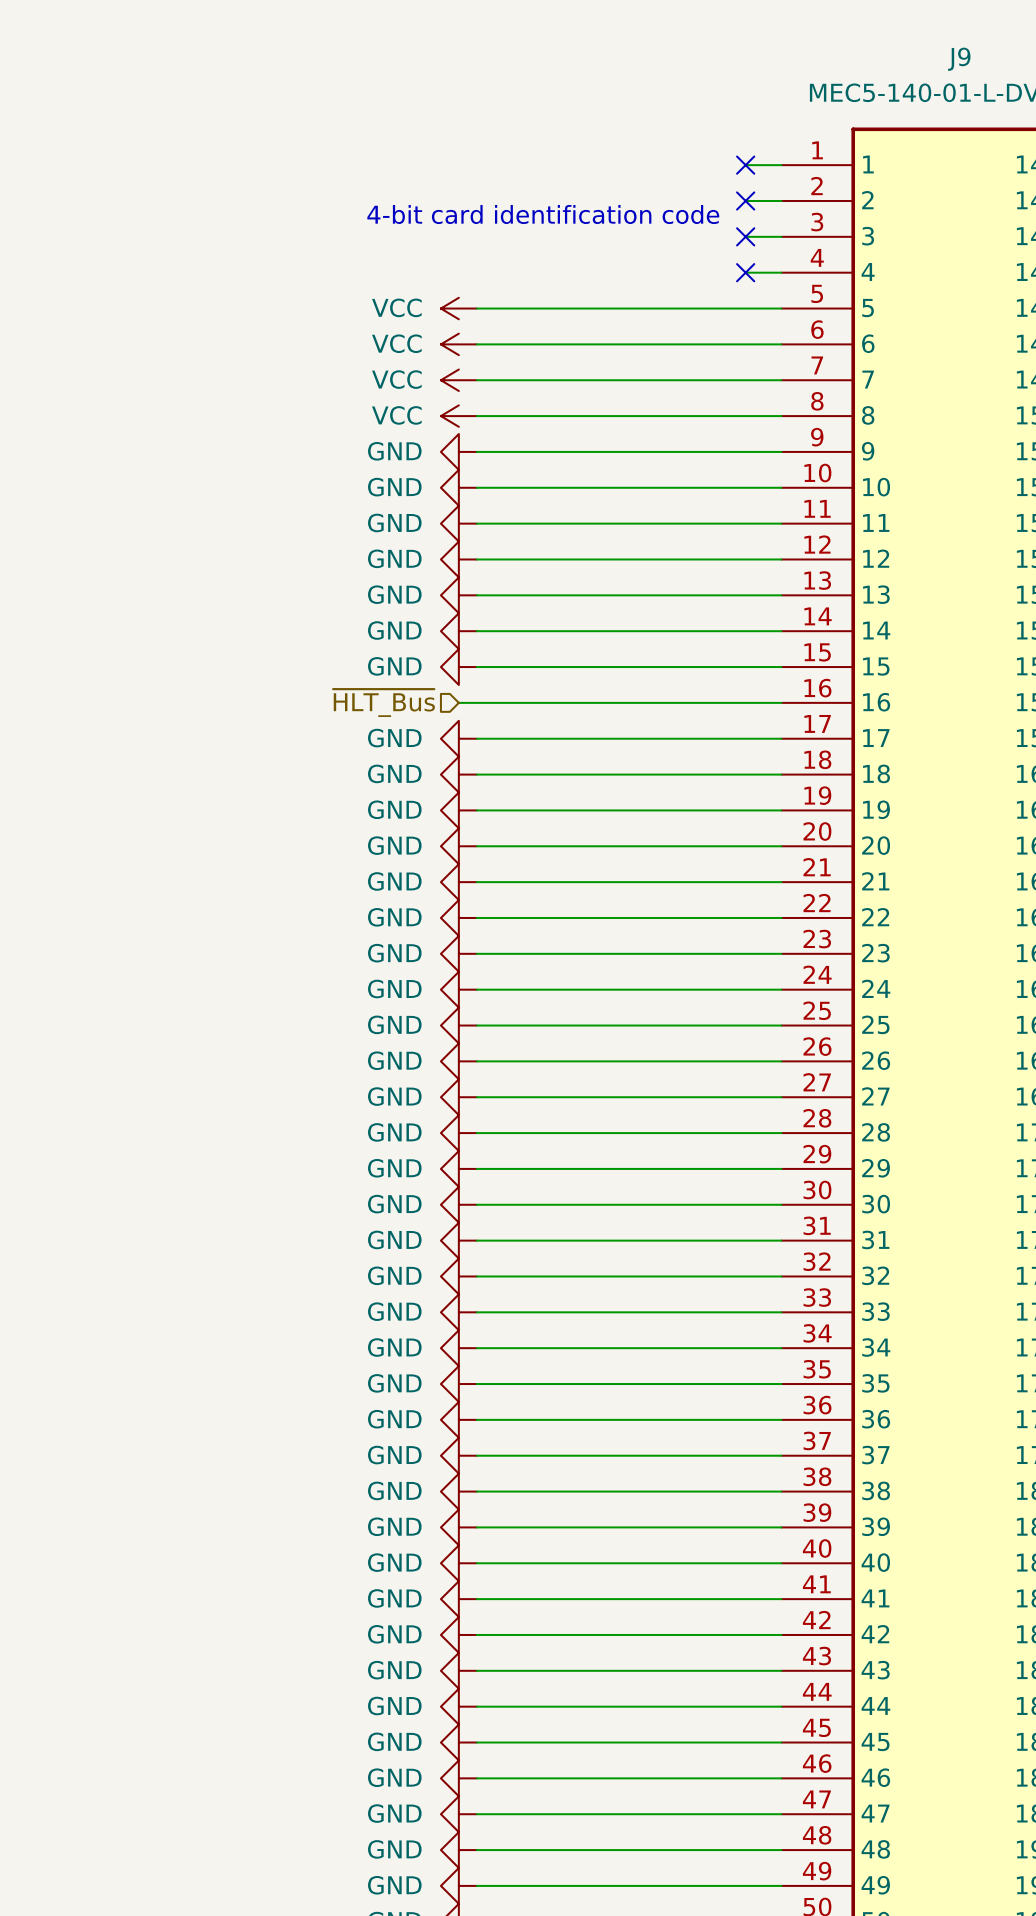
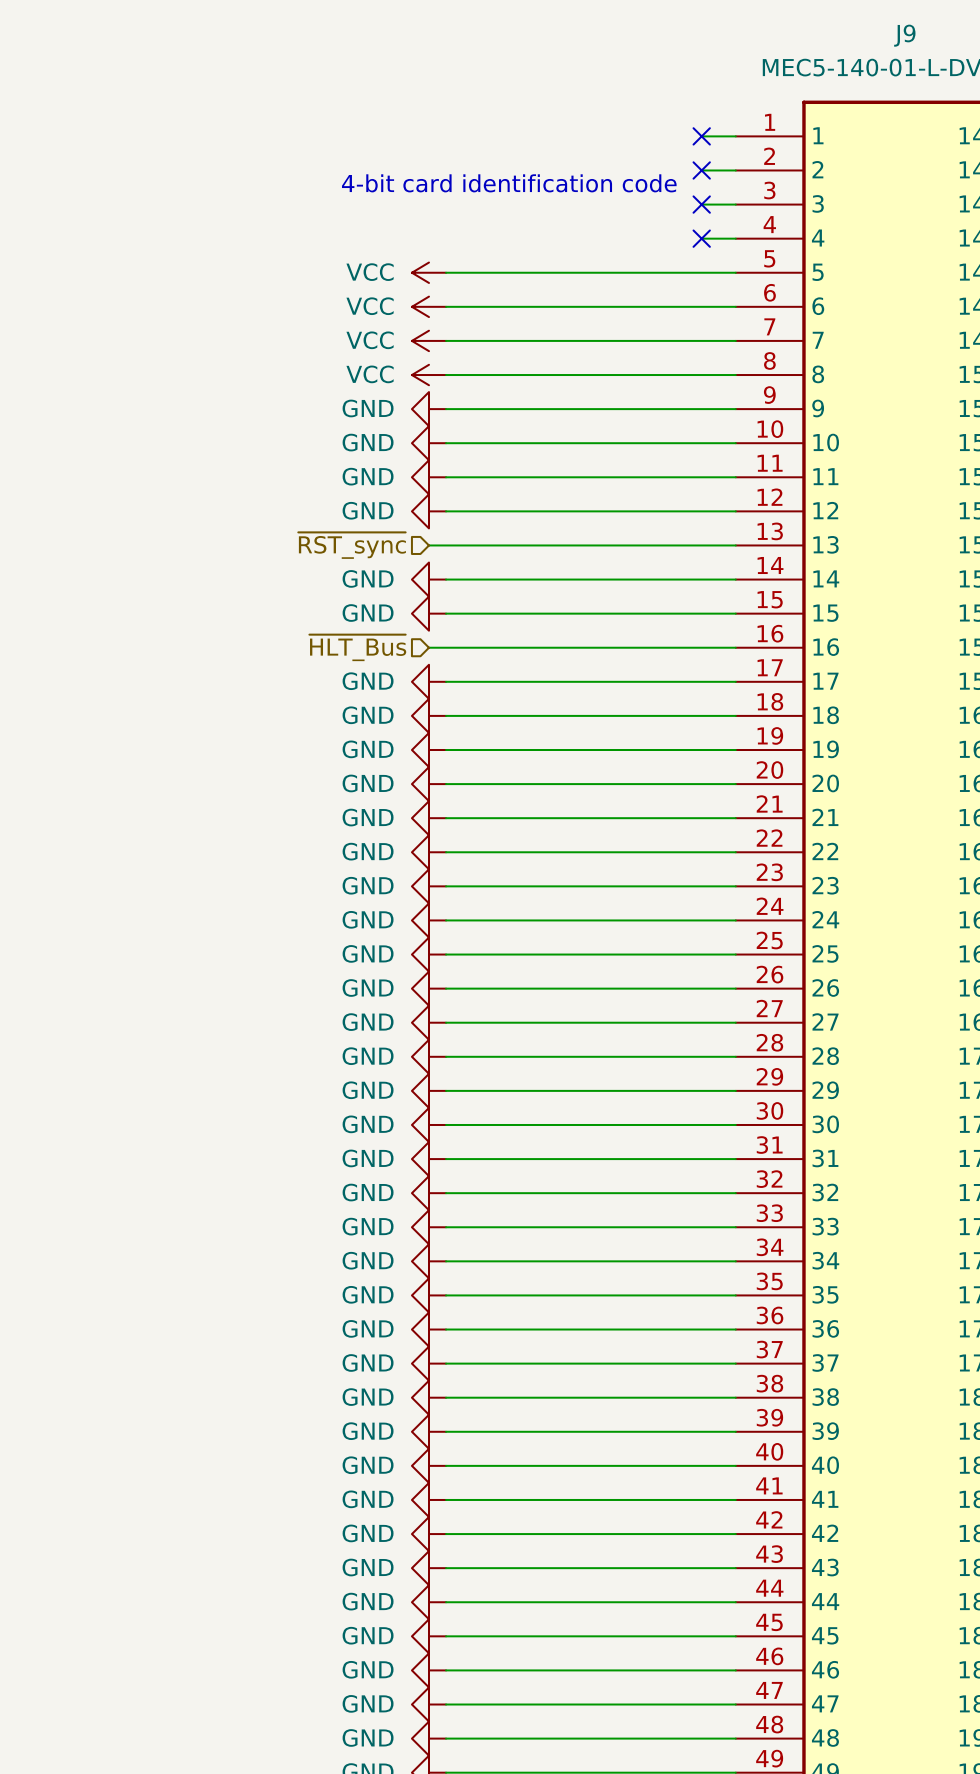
hierarchical label: none -> ~{RST_sync} (352, 545)
power symbol: GND (458, 595) -> none

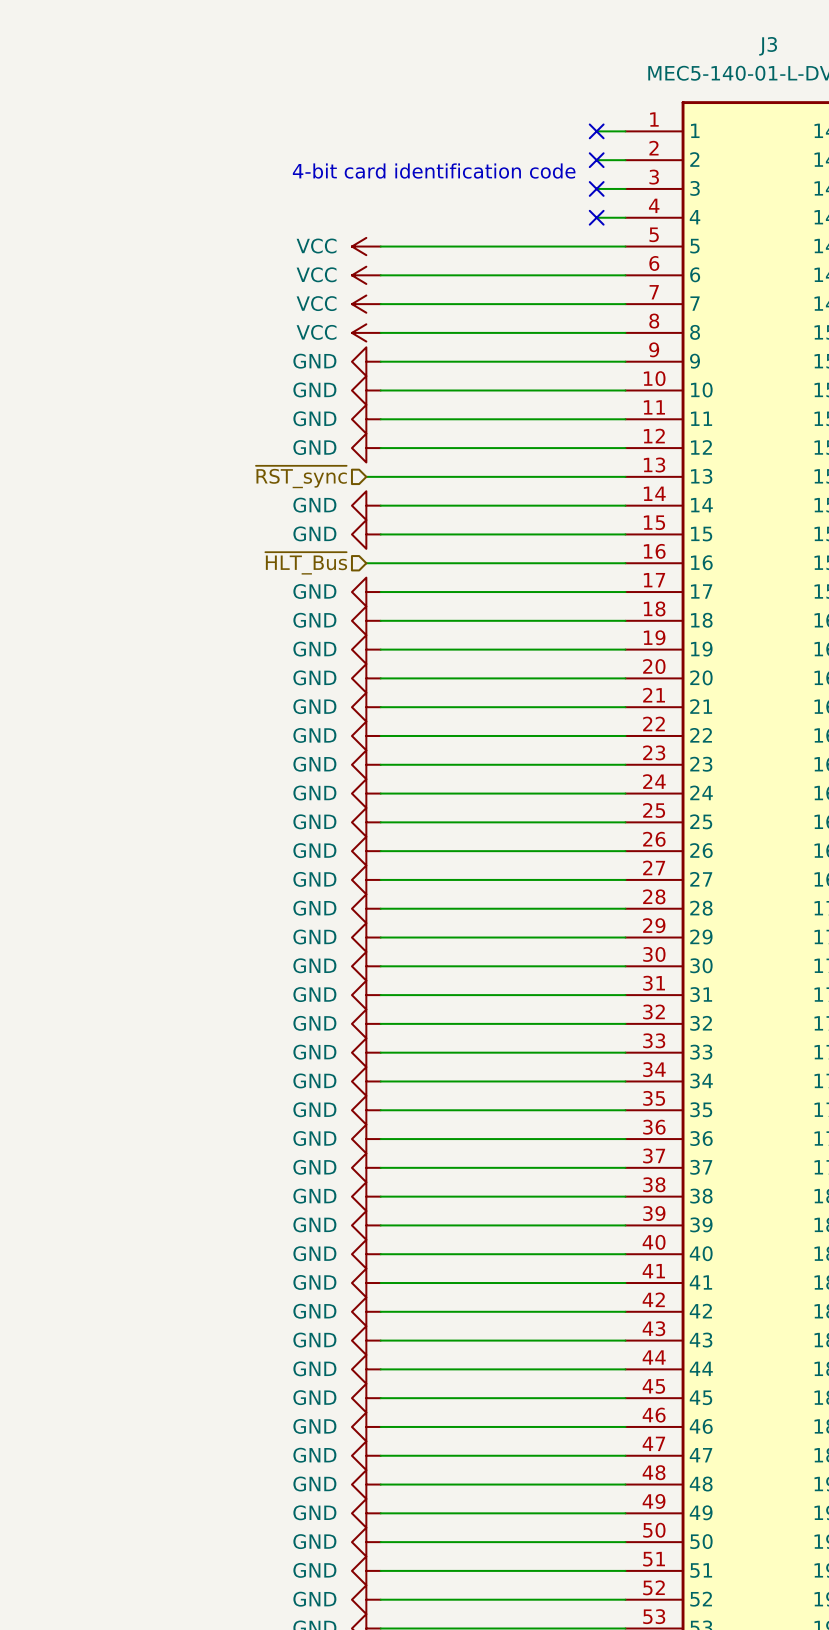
J9 name: J9 (904, 35) -> J3 (768, 46)

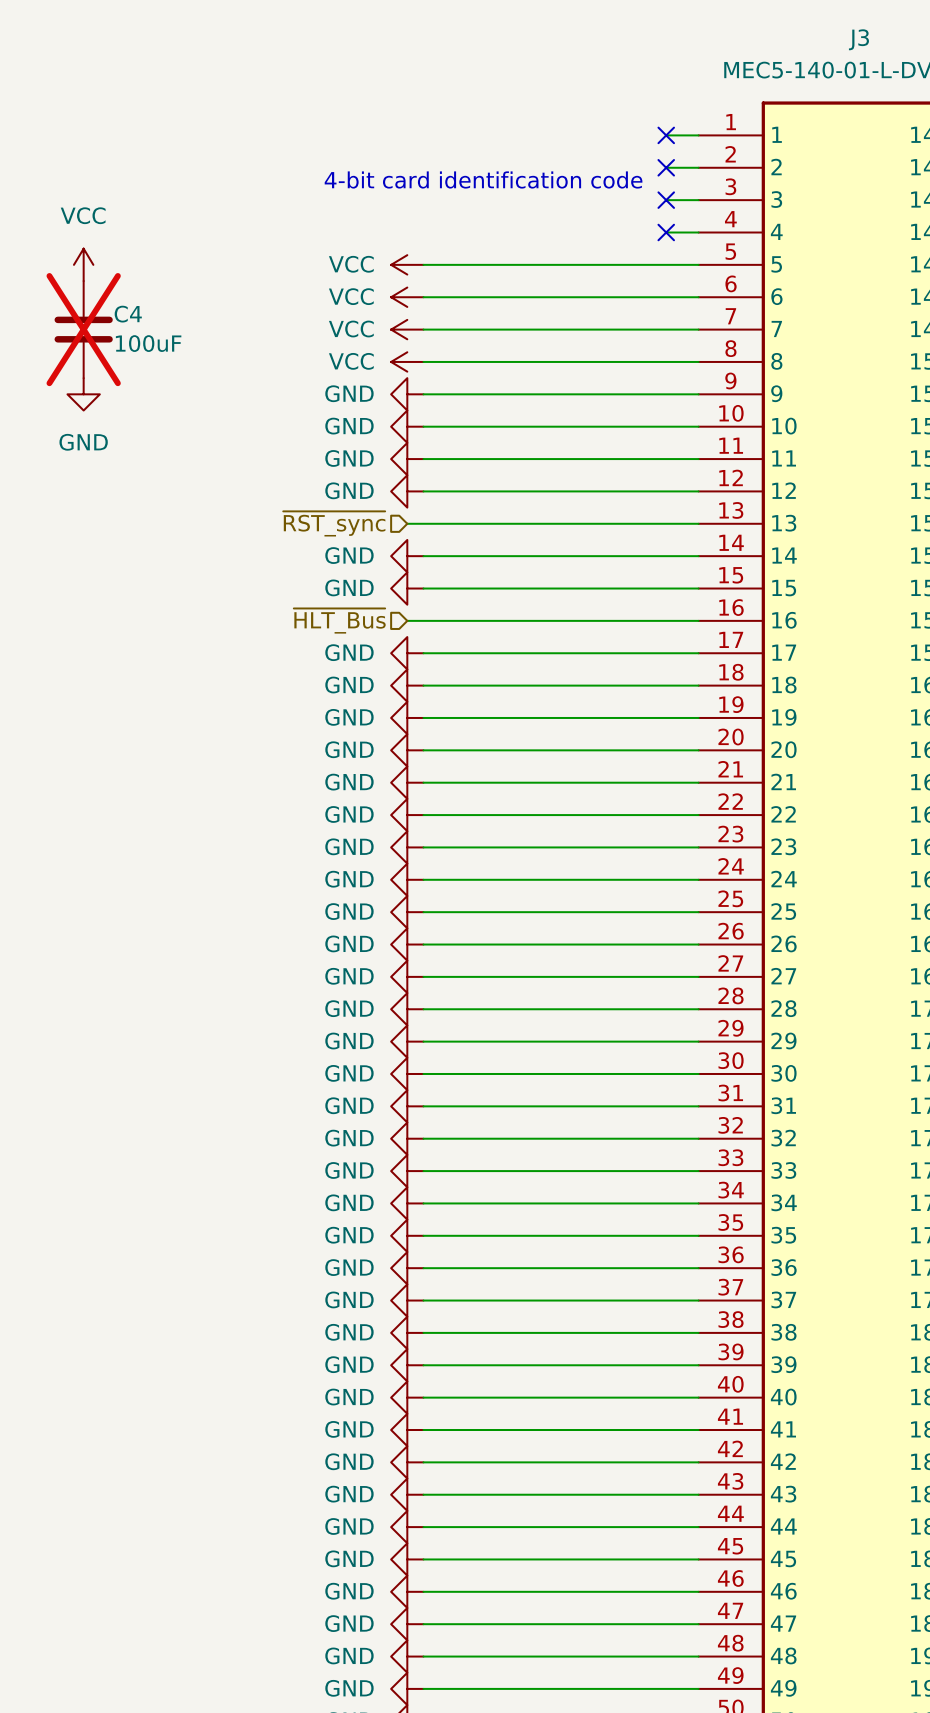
power symbol: none -> VCC (83, 264)
C4: none -> 100uF (83, 329)
power symbol: none -> GND (83, 394)

